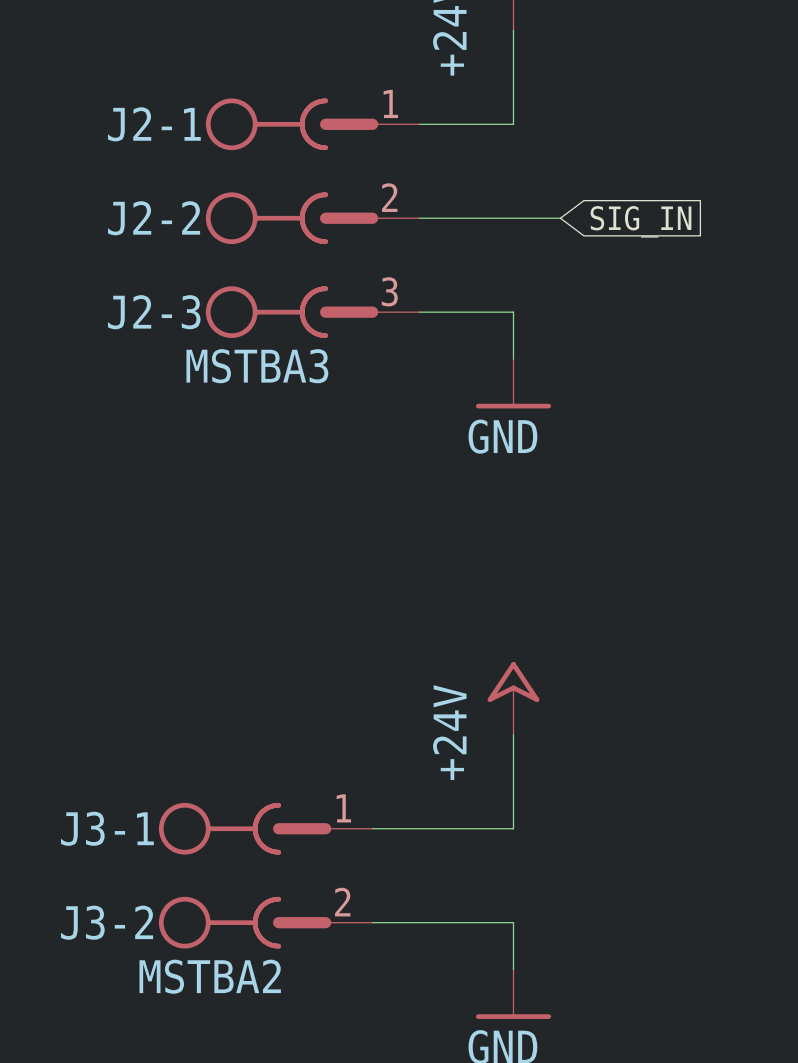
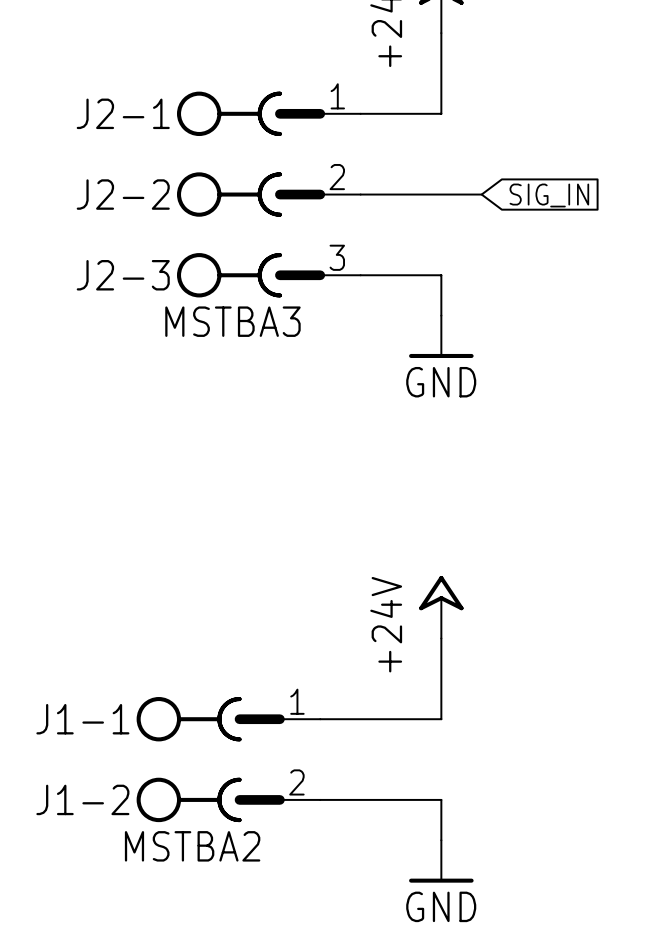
J3-1 name: J3-1 (107, 828) -> J1-1 (82, 719)
J3-2 name: J3-2 (107, 922) -> J1-2 (82, 799)

